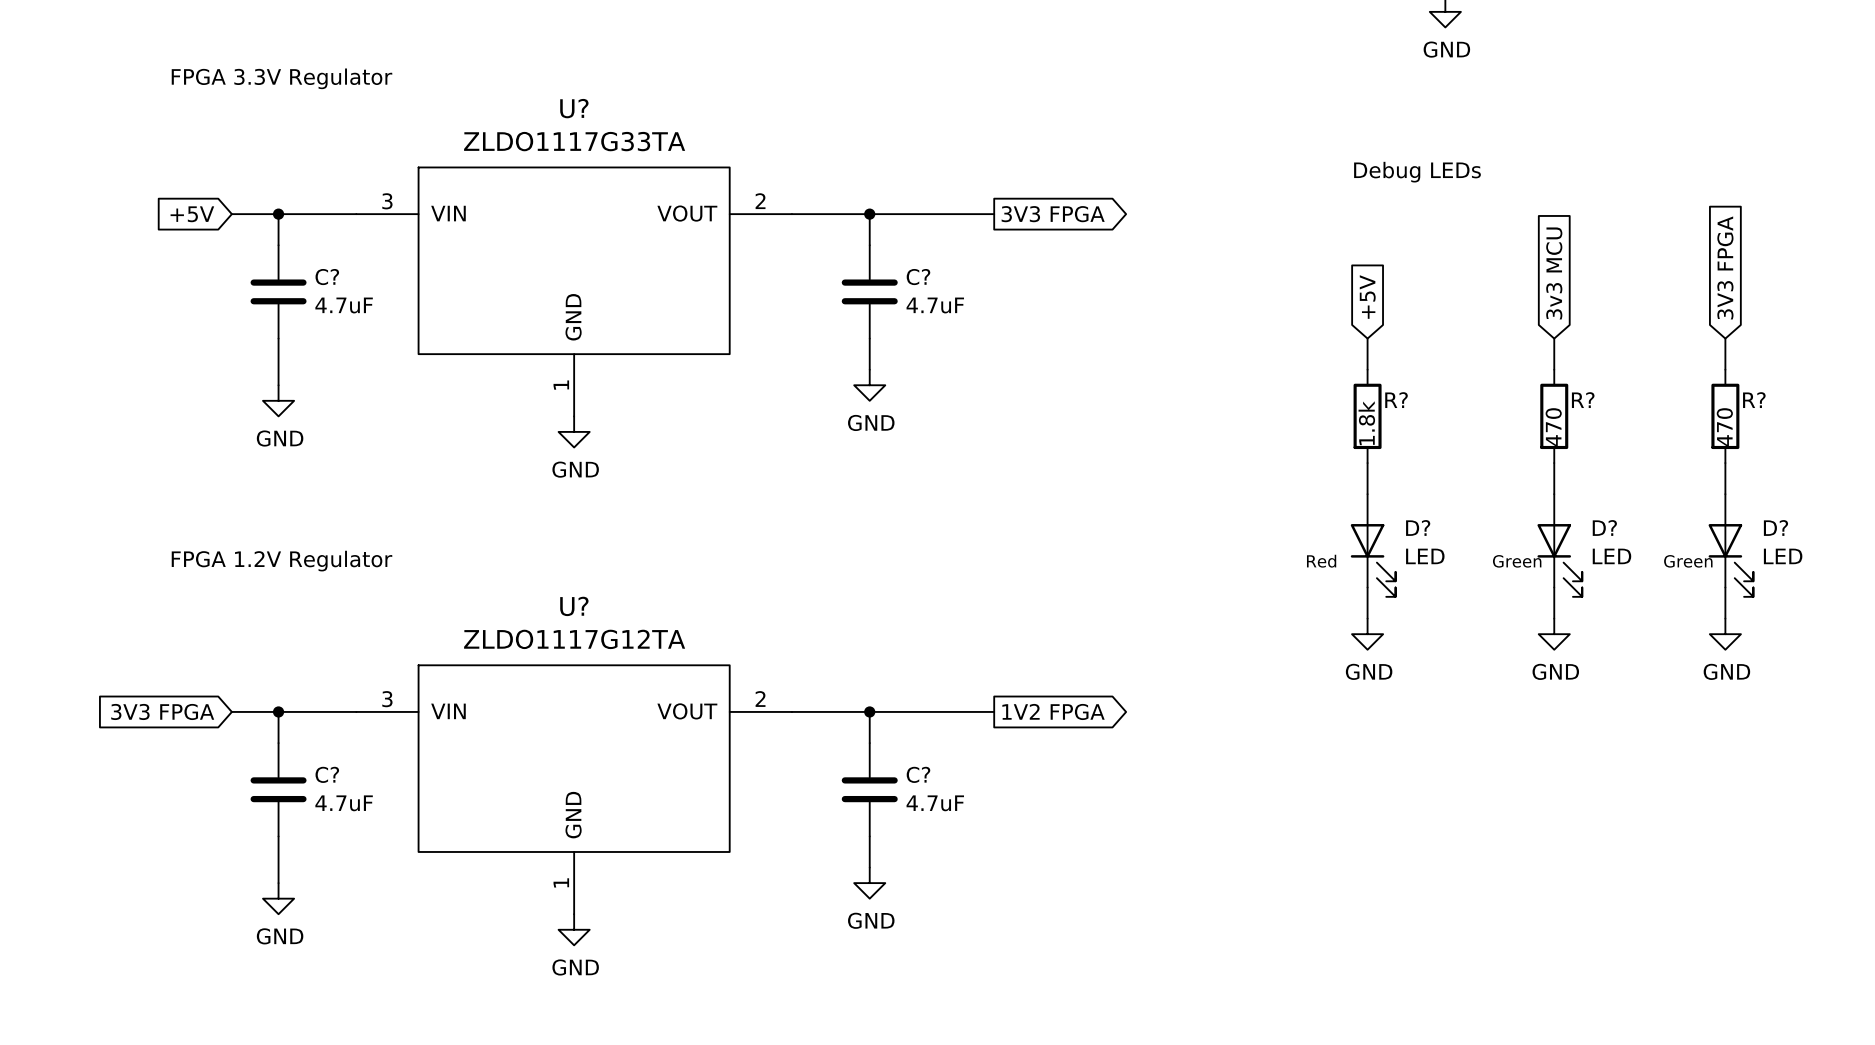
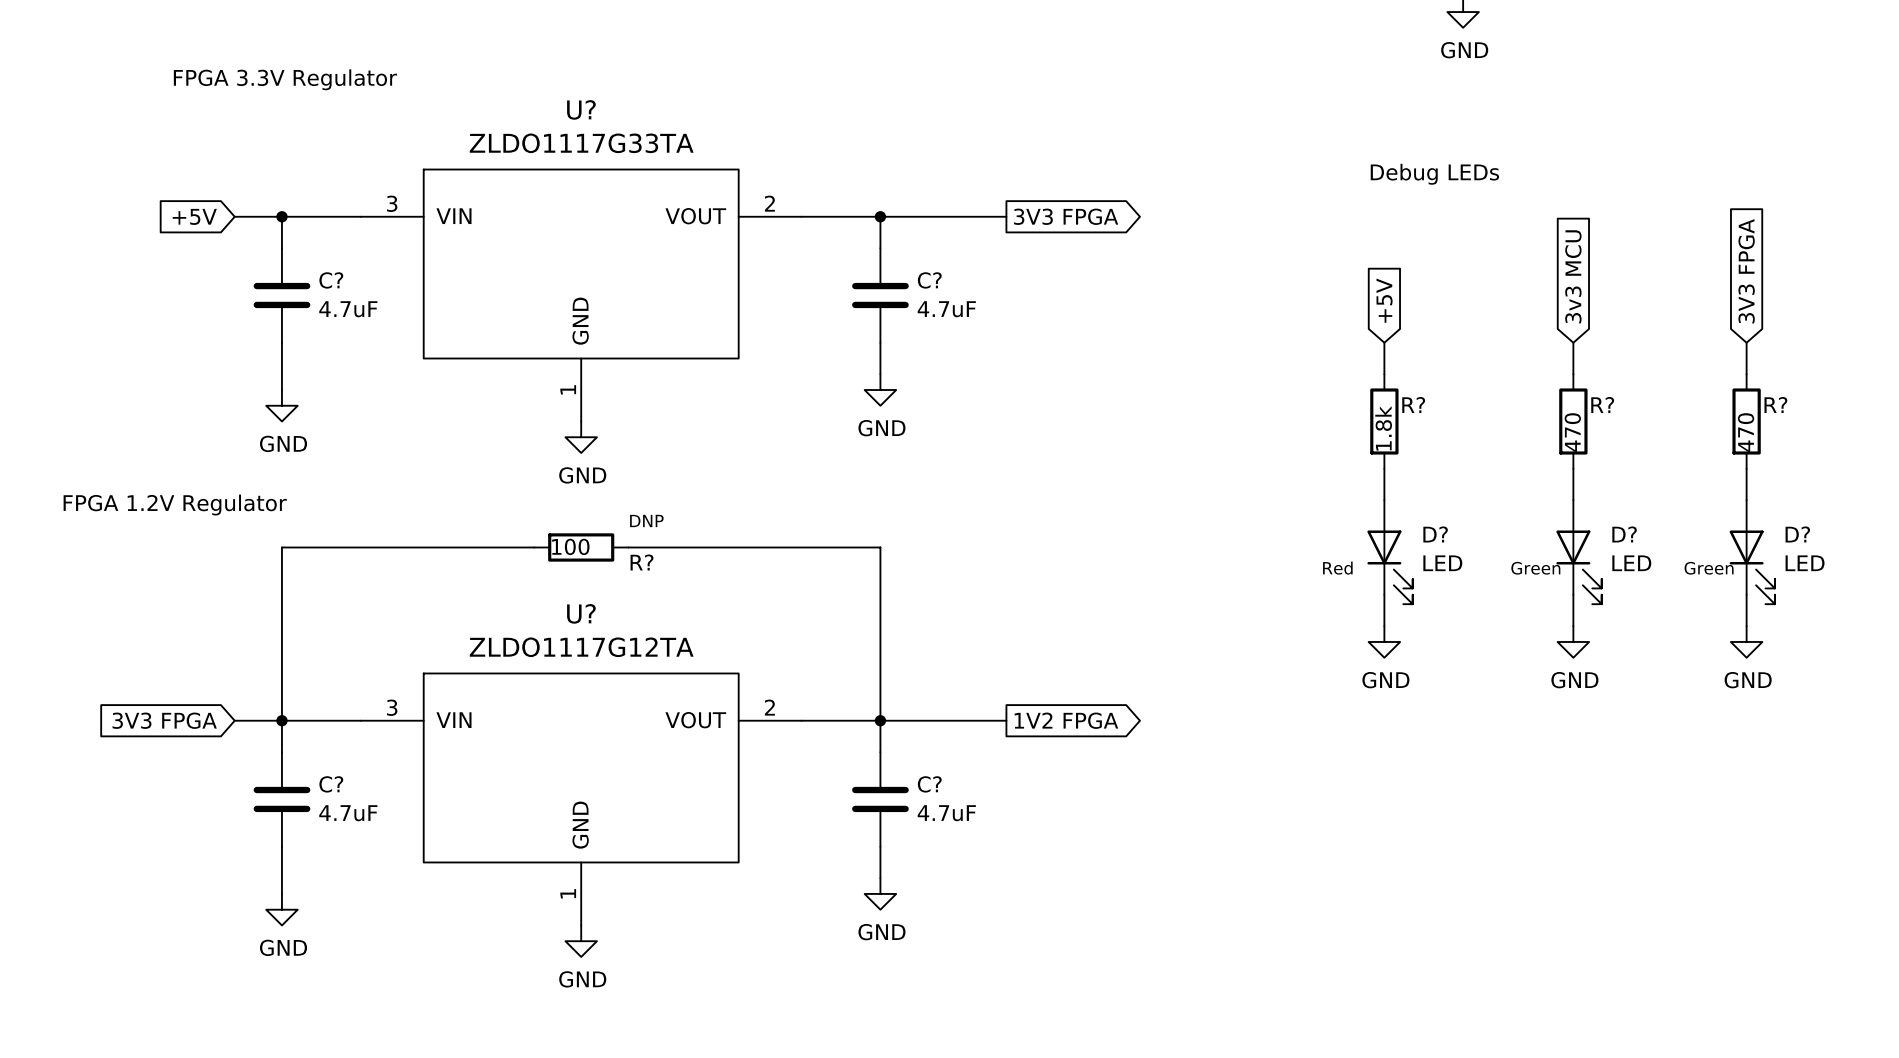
text: none -> DNP (646, 520)
wire: none -> (533, 547) (281, 547) (281, 720)
R?: none -> 100 (581, 547)
wire: none -> (628, 547) (880, 547) (880, 720)
text position: FPGA 1.2V Regulator (281, 561) -> FPGA 1.2V Regulator (175, 505)

